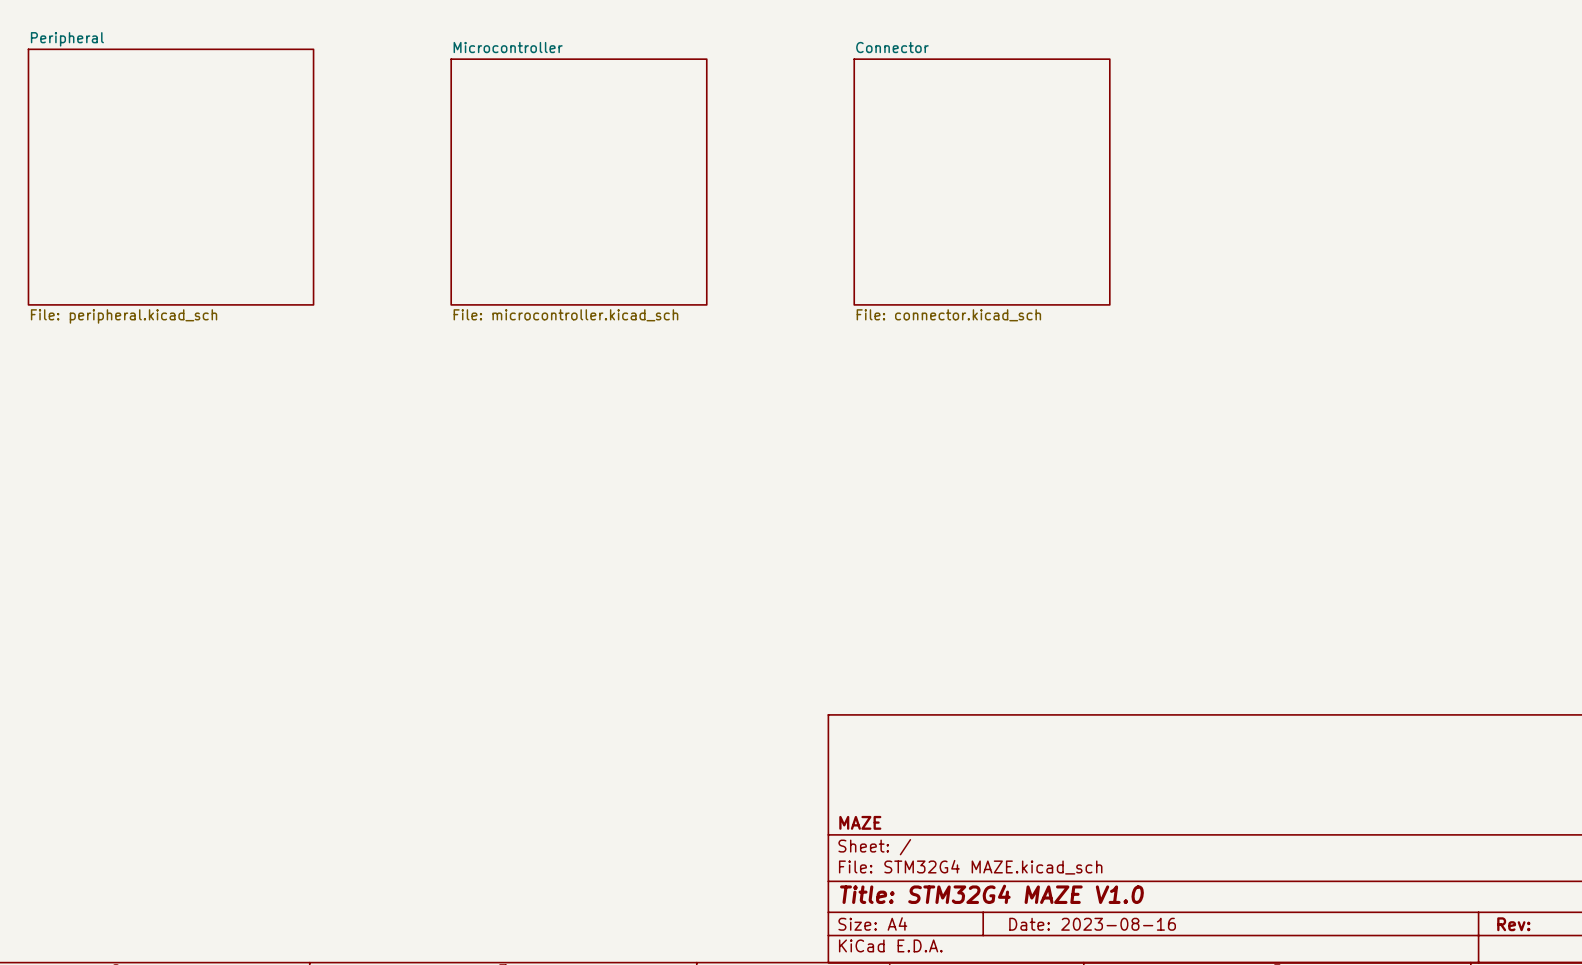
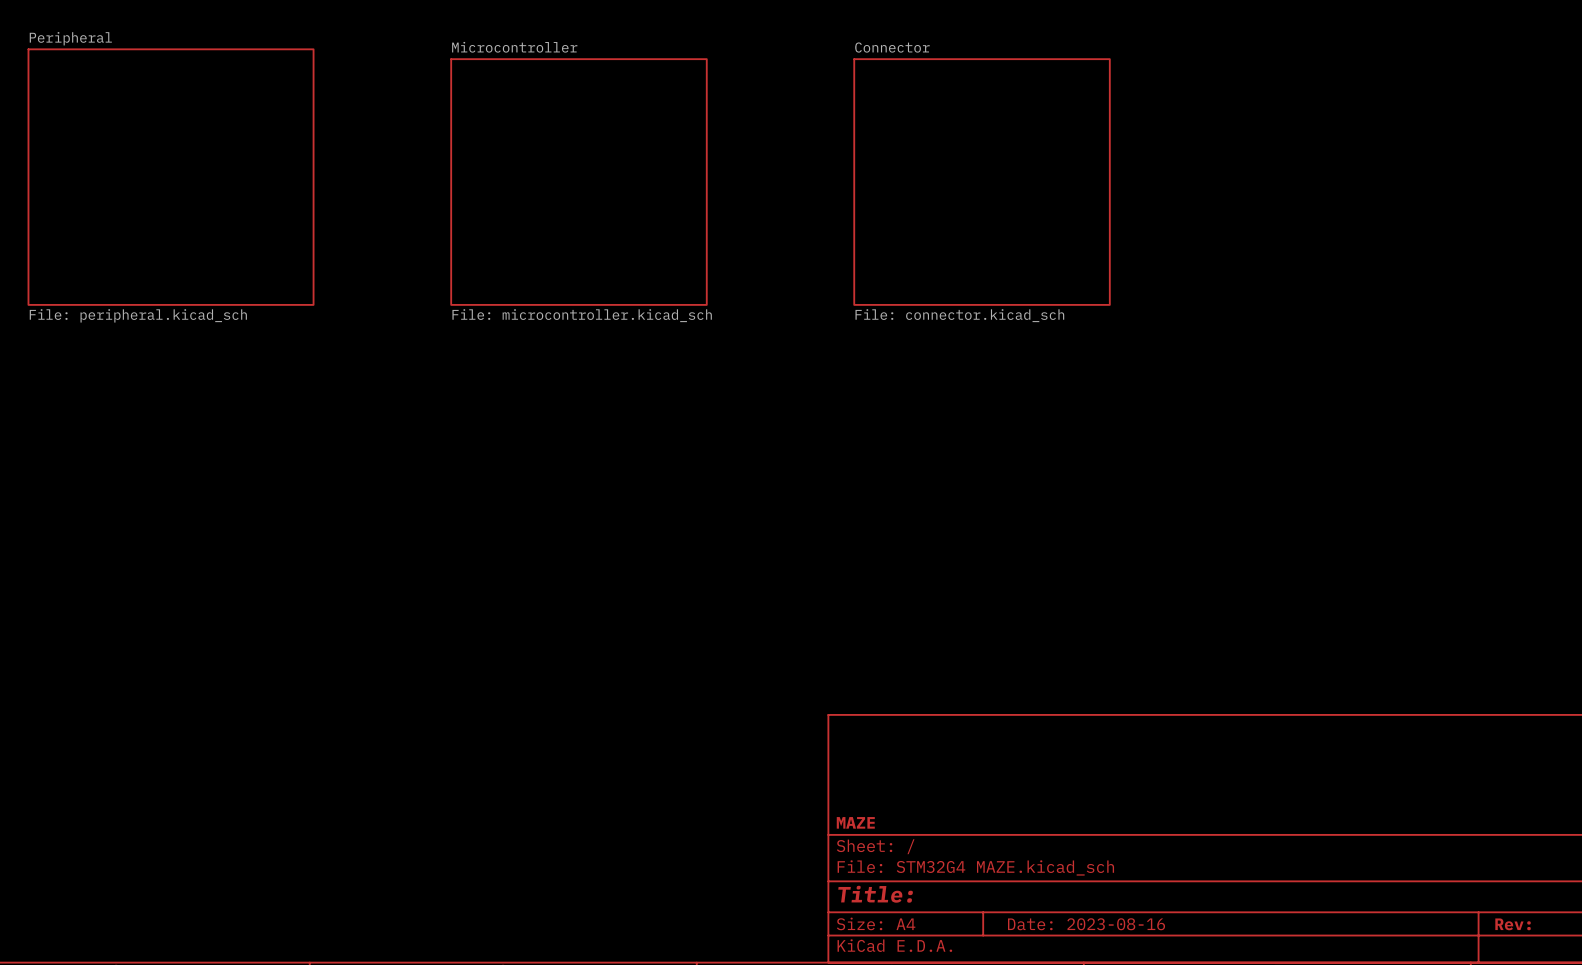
title block: Title: STM32G4 MAZE V1.0 (991, 894) -> Title: (875, 894)

